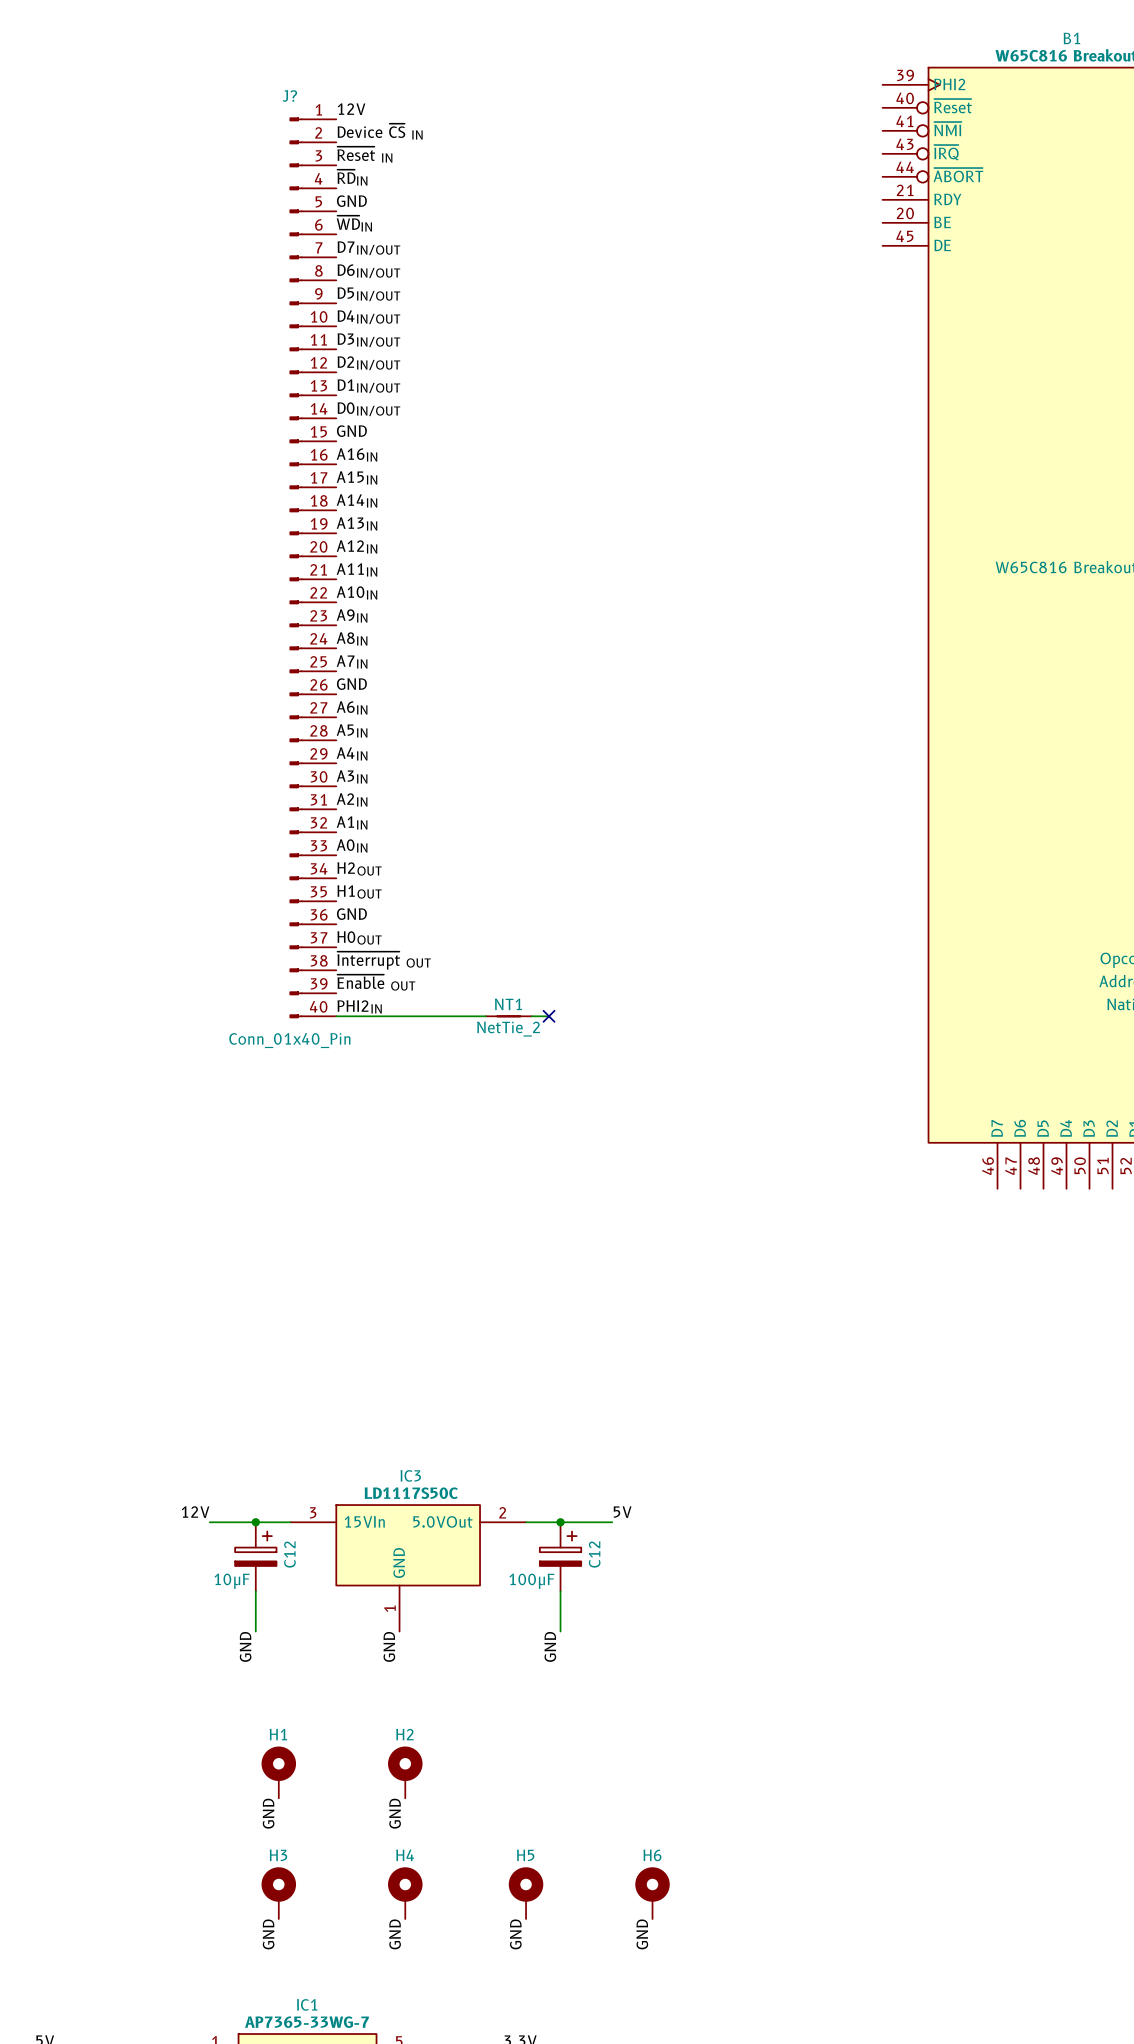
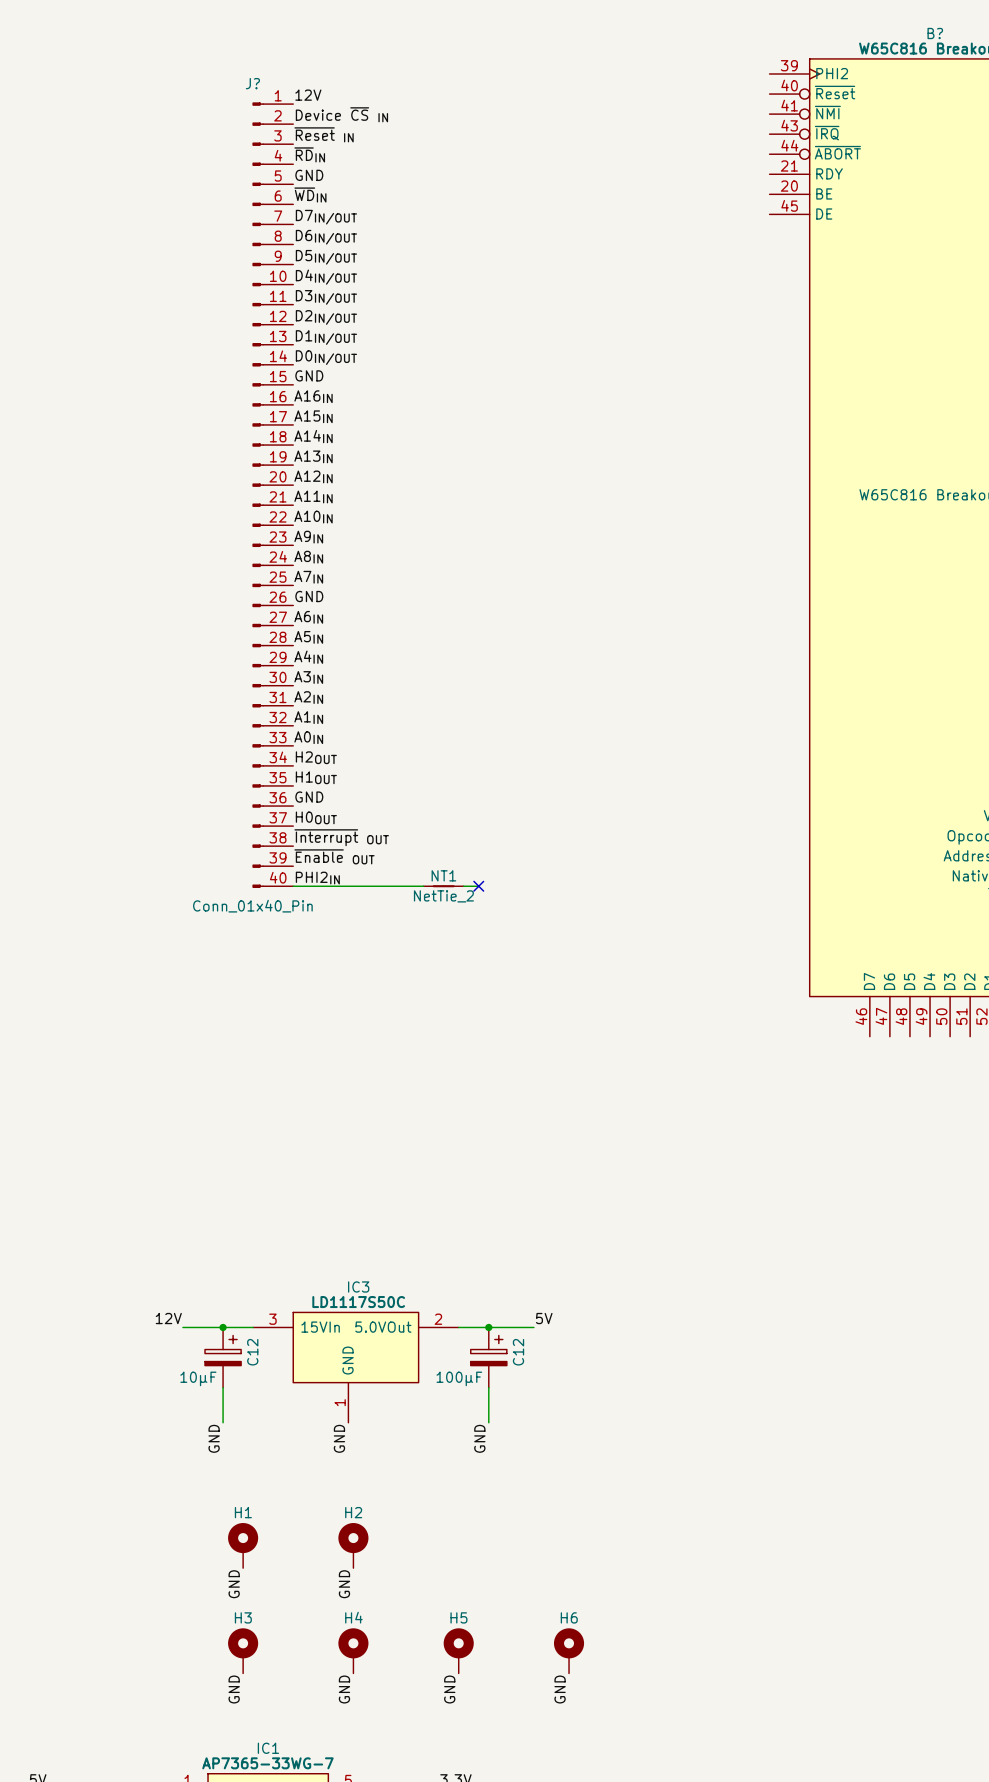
B1 name: B1 (1071, 38) -> B? (935, 33)

